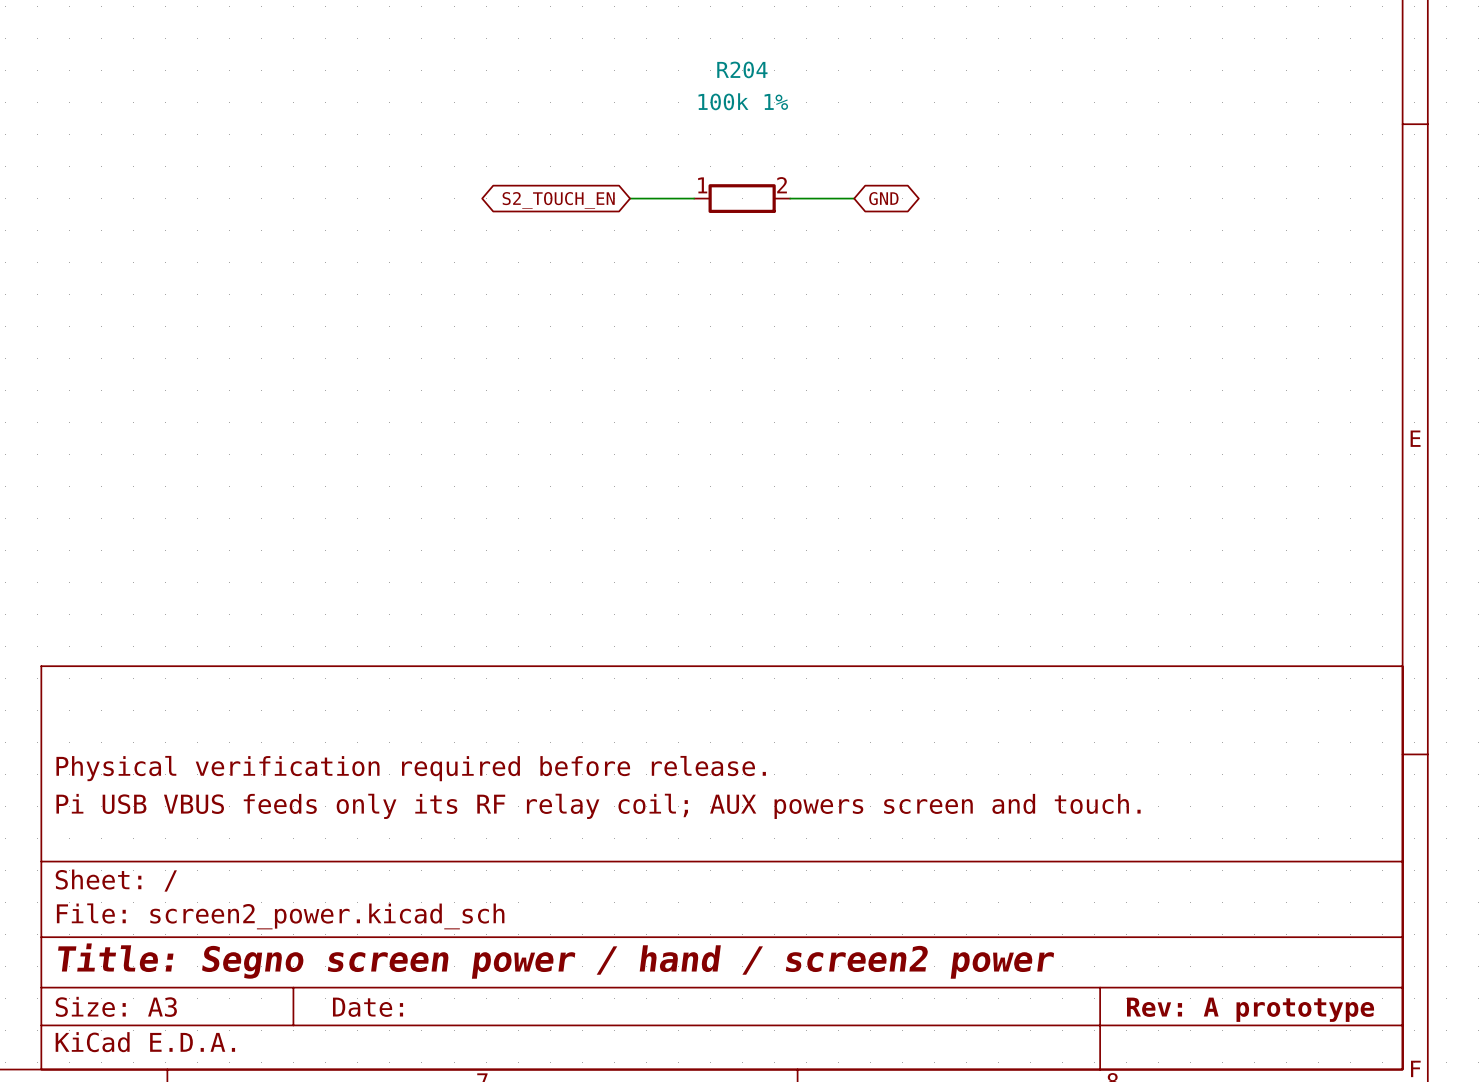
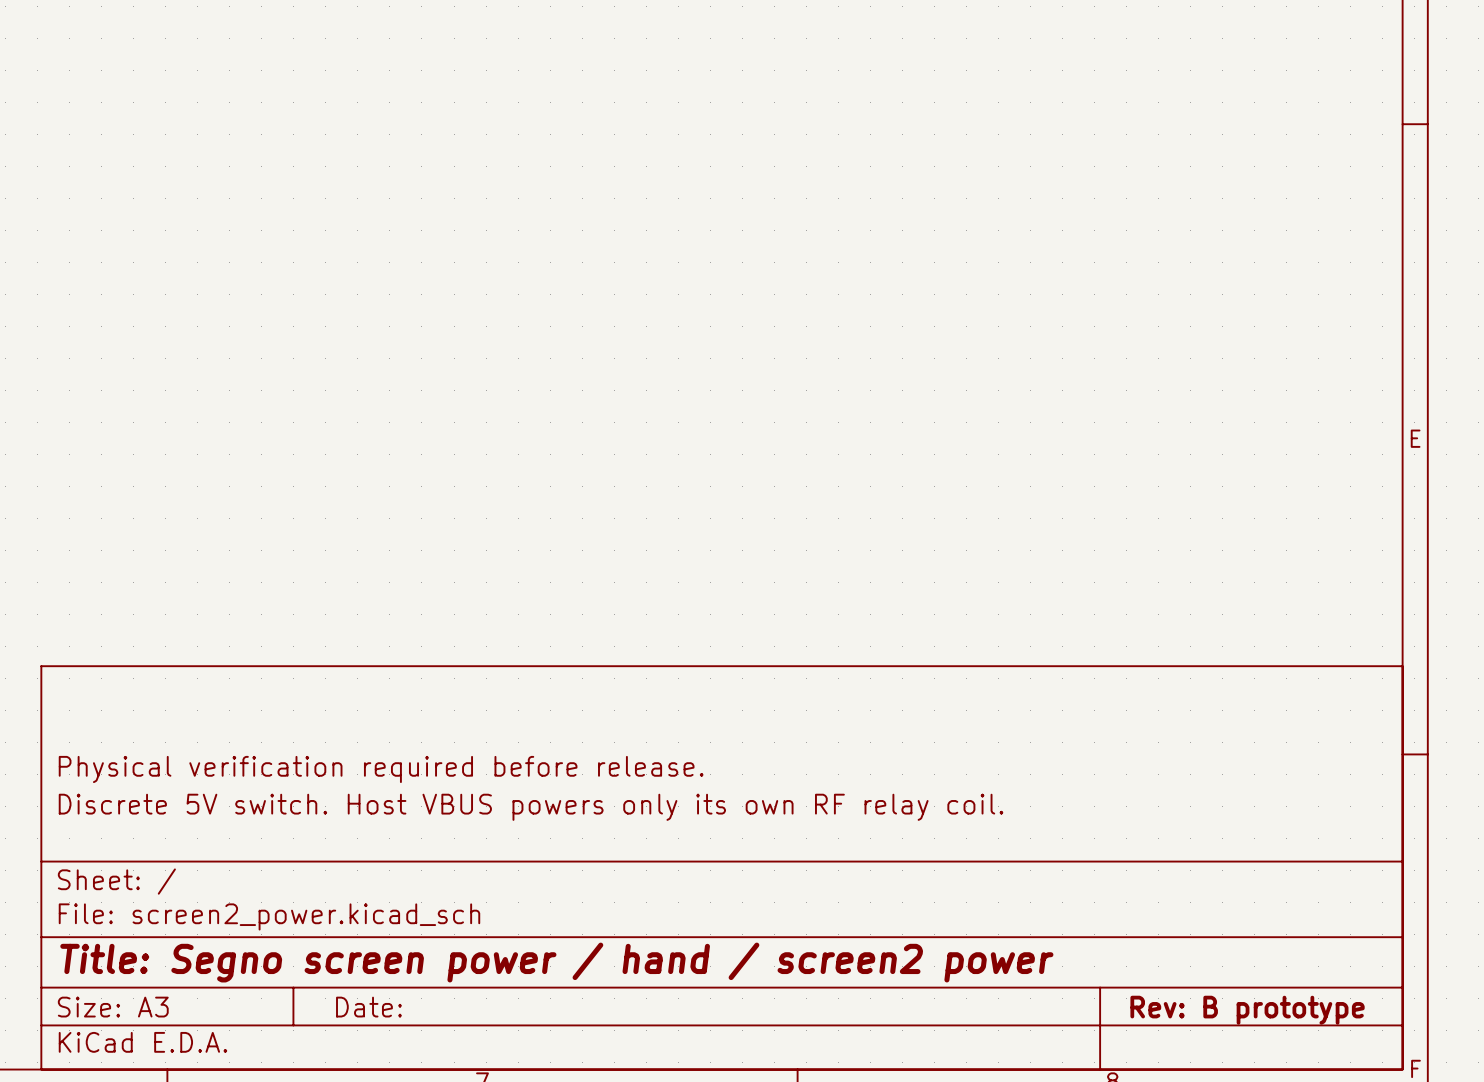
wire: (630, 198) (694, 198) -> none
R204: 100k 1% (742, 198) -> none
wire: (790, 198) (854, 198) -> none
global label: GND (883, 198) -> none
global label: S2_TOUCH_EN (558, 200) -> none
title block: Pi USB VBUS feeds only its RF relay coil; AUX powers screen and touch. (598, 806) -> Discrete 5V switch. Host VBUS powers only its own RF relay coil. (531, 807)
title block: Rev: A prototype (1250, 1009) -> Rev: B prototype (1247, 1010)

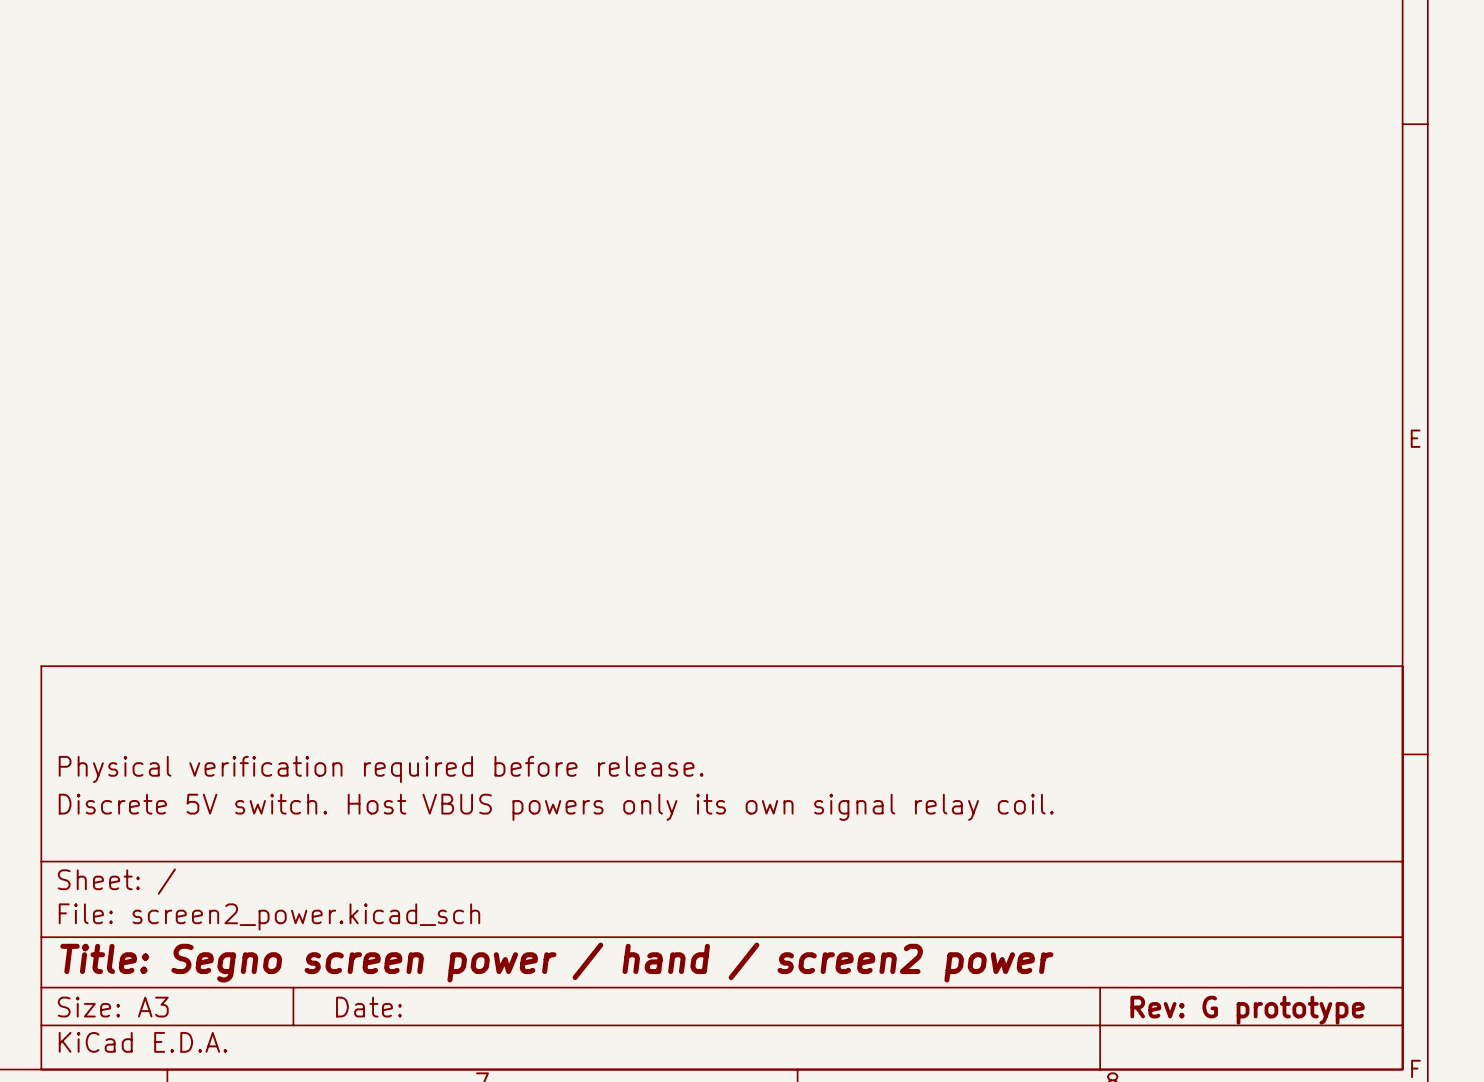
title block: Discrete 5V switch. Host VBUS powers only its own RF relay coil. (531, 807) -> Discrete 5V switch. Host VBUS powers only its own signal relay coil. (556, 807)
title block: Rev: B prototype (1247, 1010) -> Rev: G prototype (1247, 1010)

